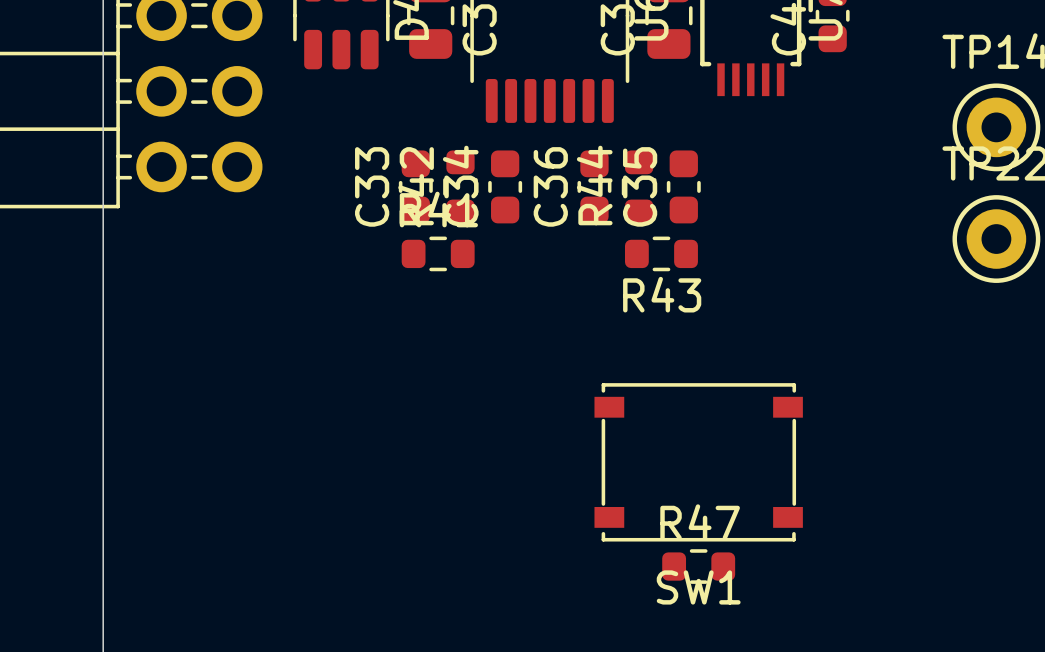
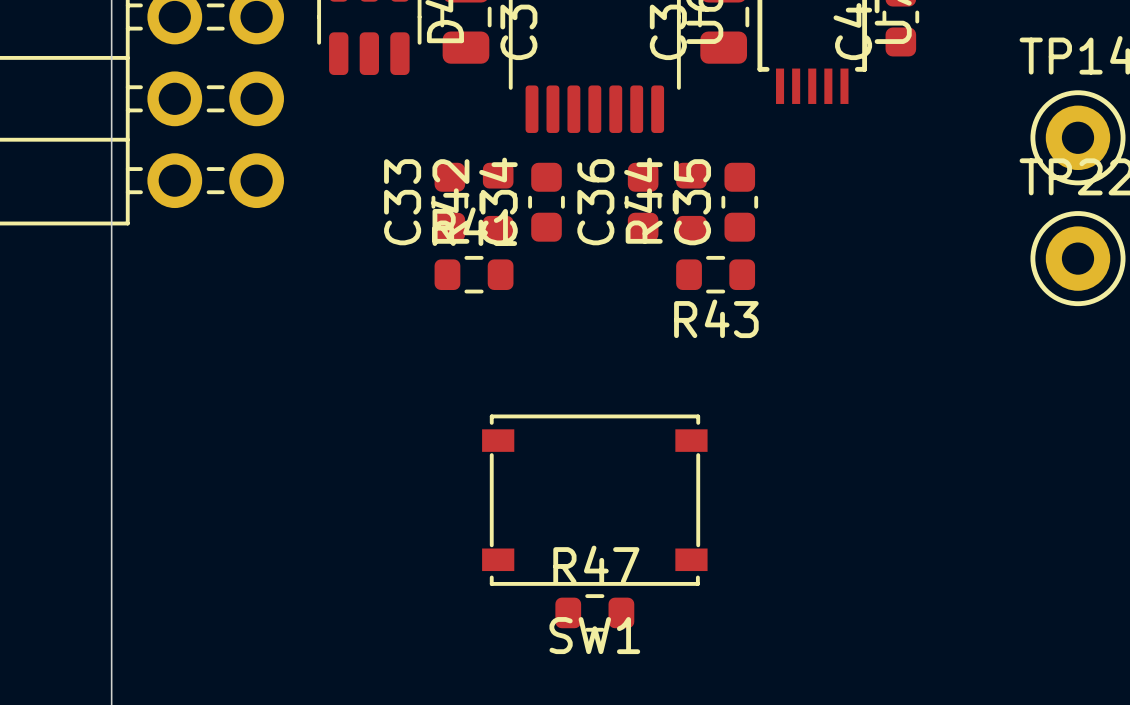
SW1 position: (698, 462) -> (594, 500)
R47 position: (698, 566) -> (594, 612)

